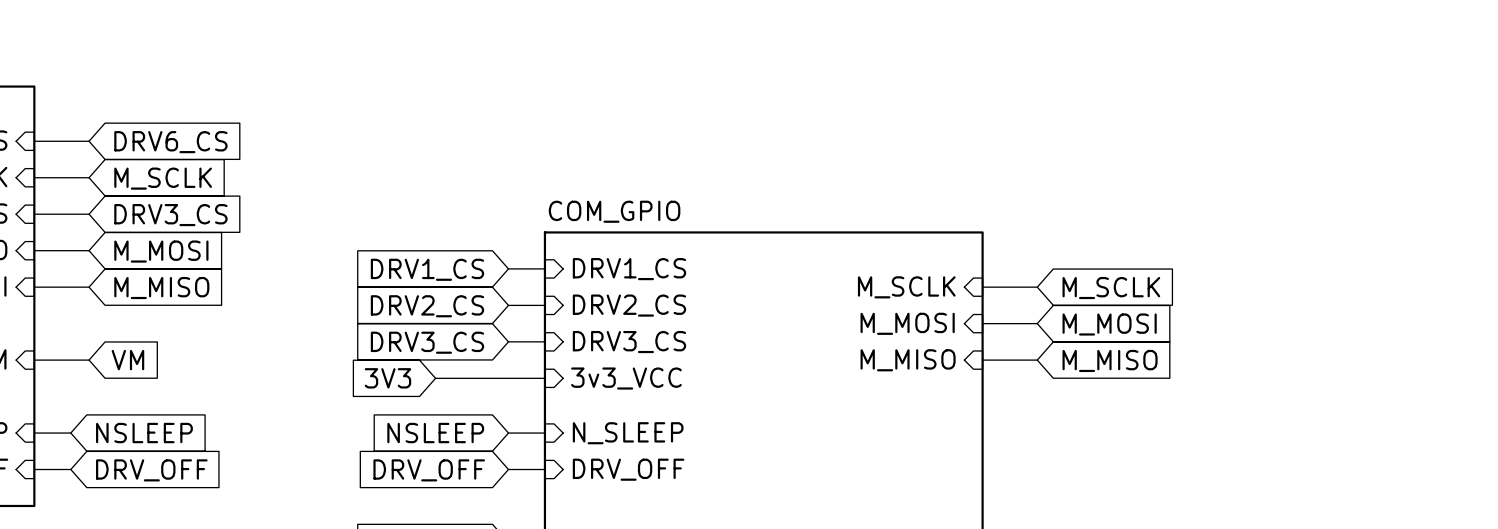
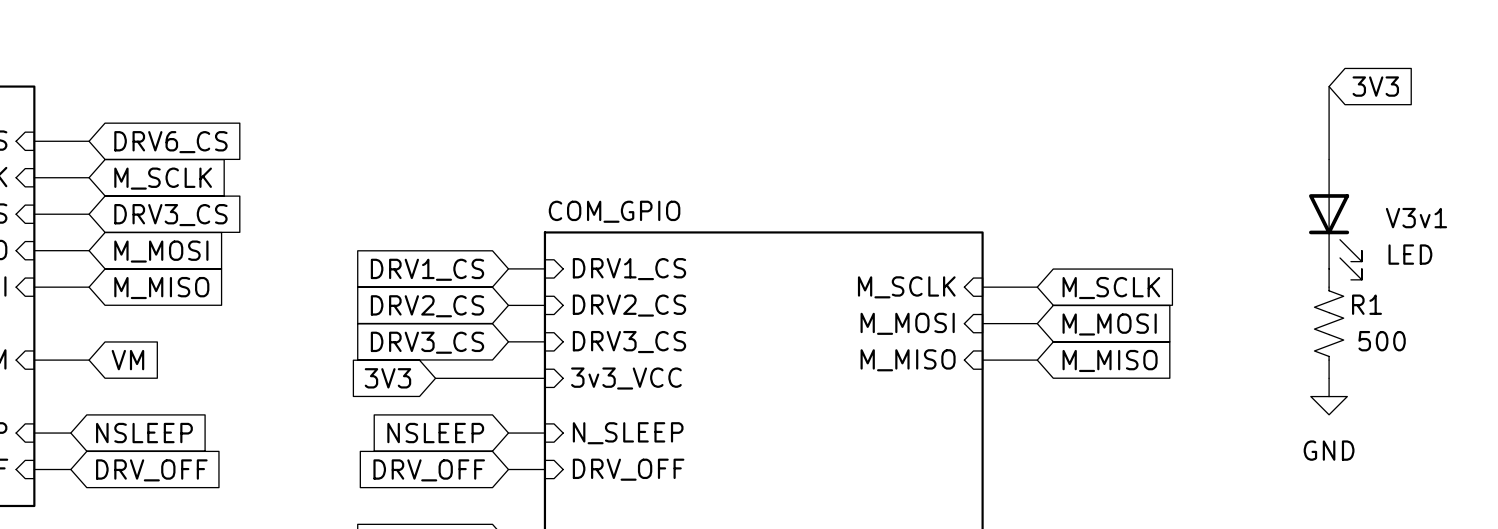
wire: none -> (1329, 86) (1329, 159)
global label: none -> 3V3 (1375, 86)
V3v1: none -> LED (1335, 219)
R1: none -> 500 (1329, 323)
power symbol: none -> GND (1329, 396)

